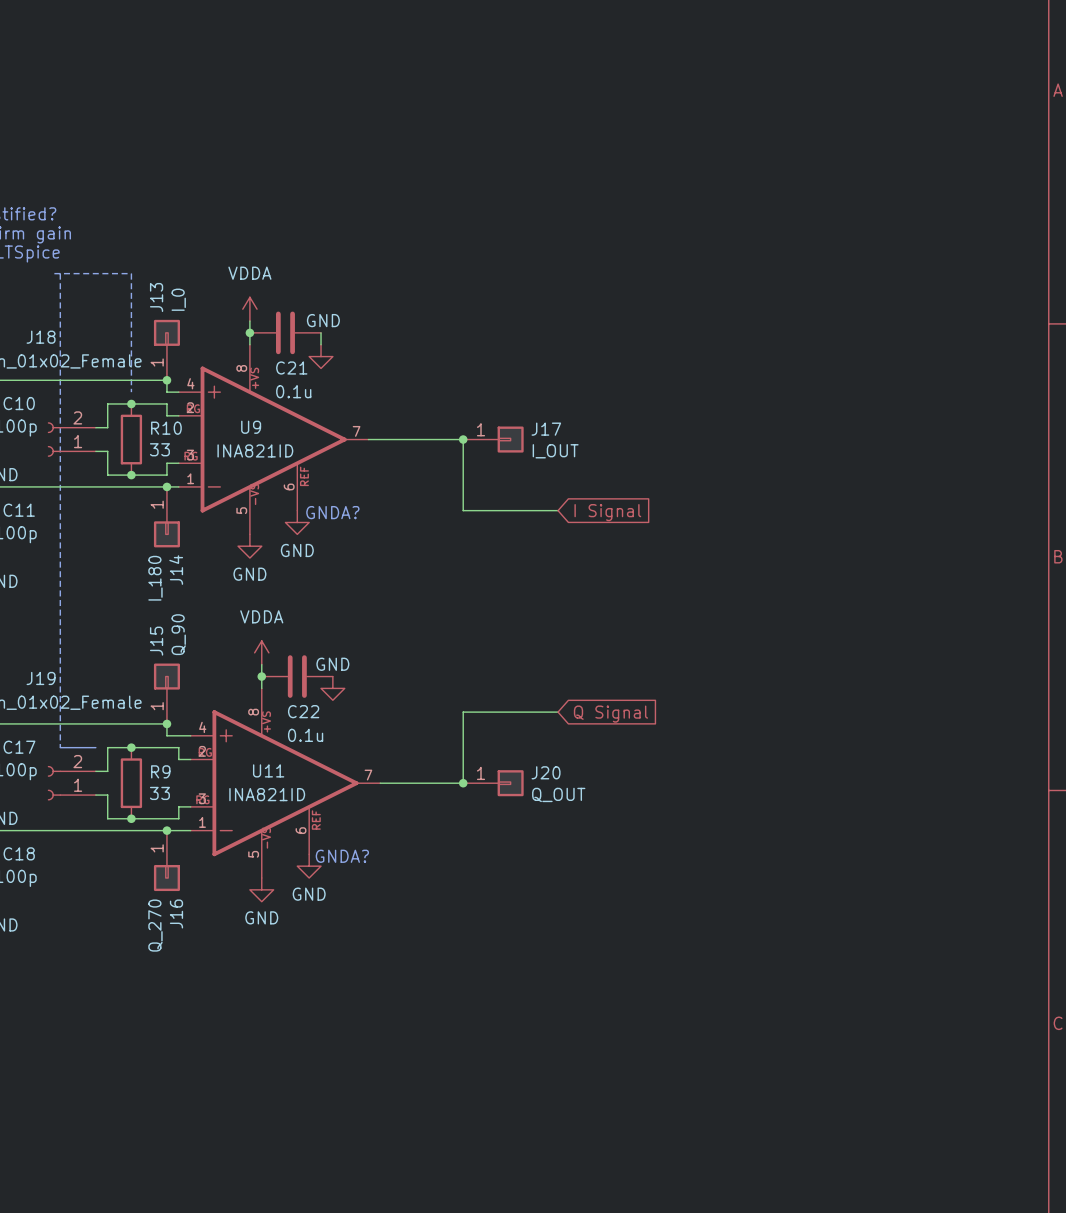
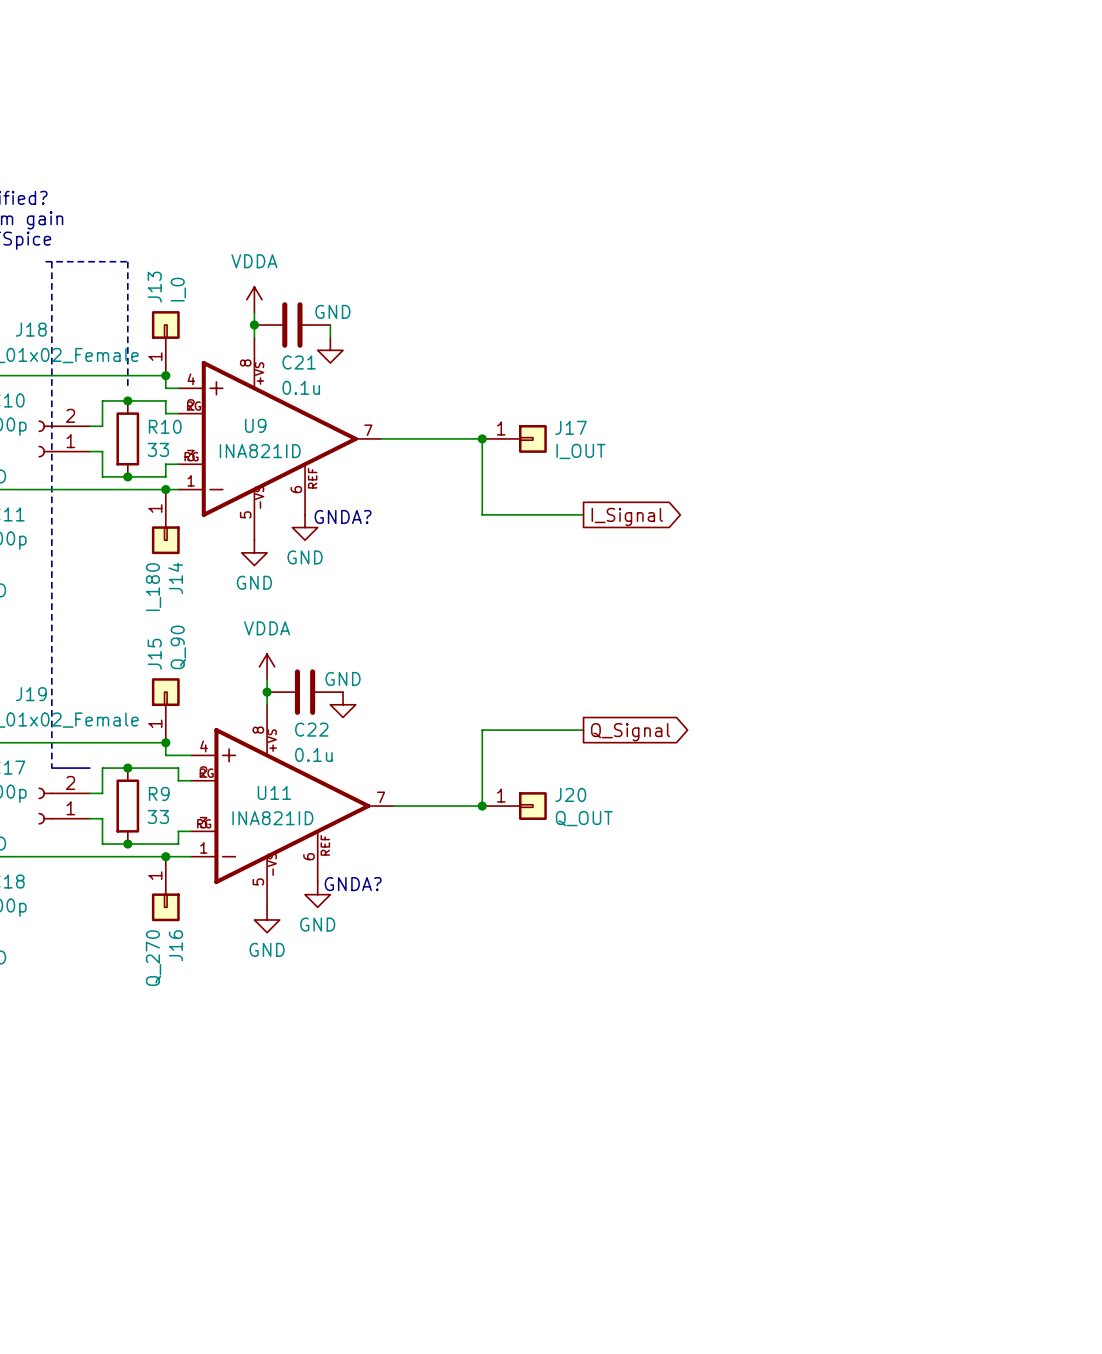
global label shape: input (607, 512) -> output (627, 517)
global label: I Signal (607, 512) -> I_Signal (627, 517)
global label shape: input (610, 714) -> output (630, 732)
global label: Q Signal (610, 714) -> Q_Signal (630, 732)

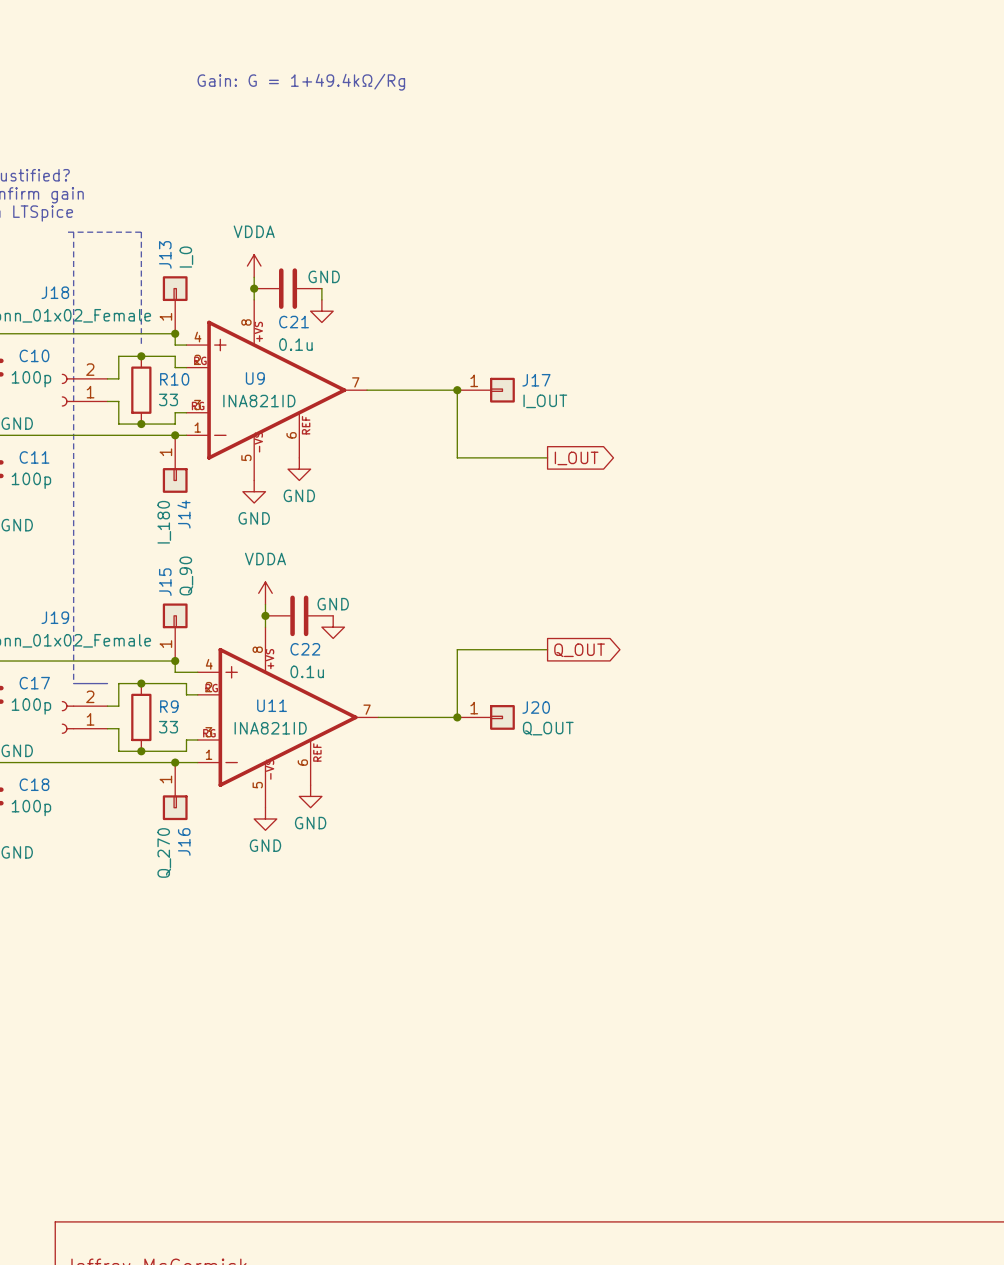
text: none -> Gain: G = 1+49.4kΩ/Rg (301, 82)
text: GNDA? (343, 516) -> none
global label: I_Signal (627, 517) -> I_OUT (576, 458)
global label: Q_Signal (630, 732) -> Q_OUT (579, 650)
text: GNDA? (353, 884) -> none

